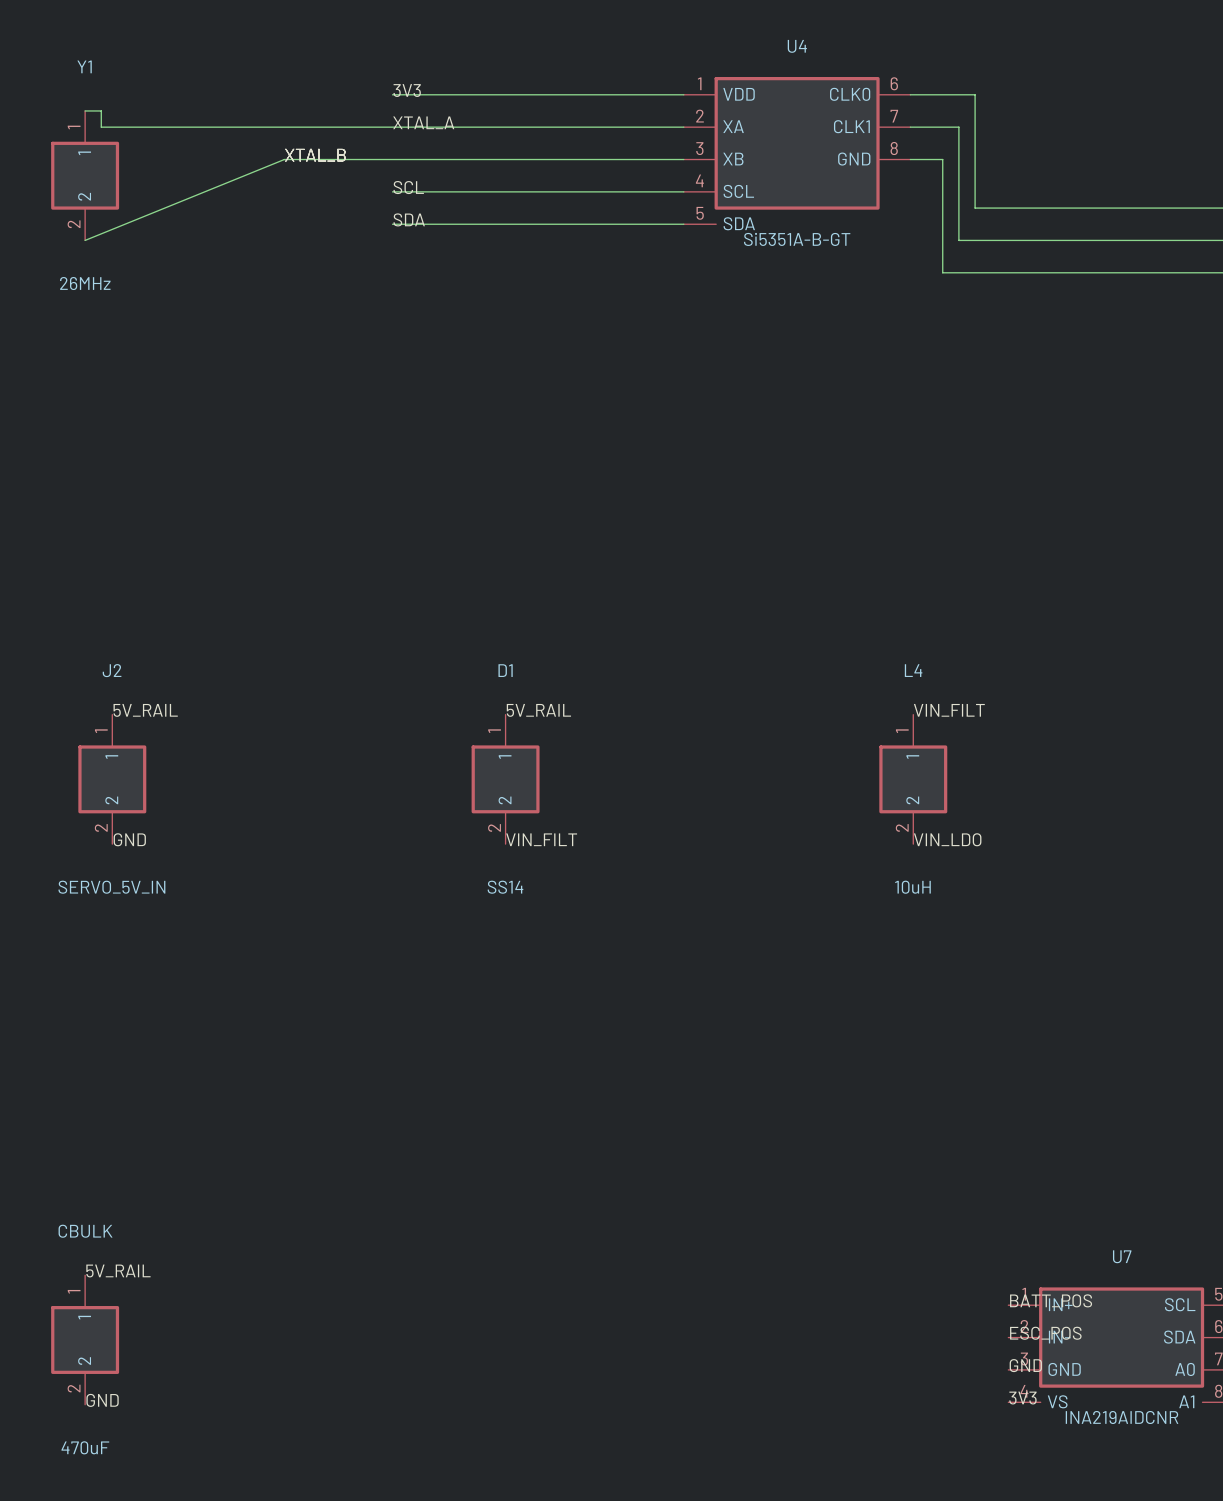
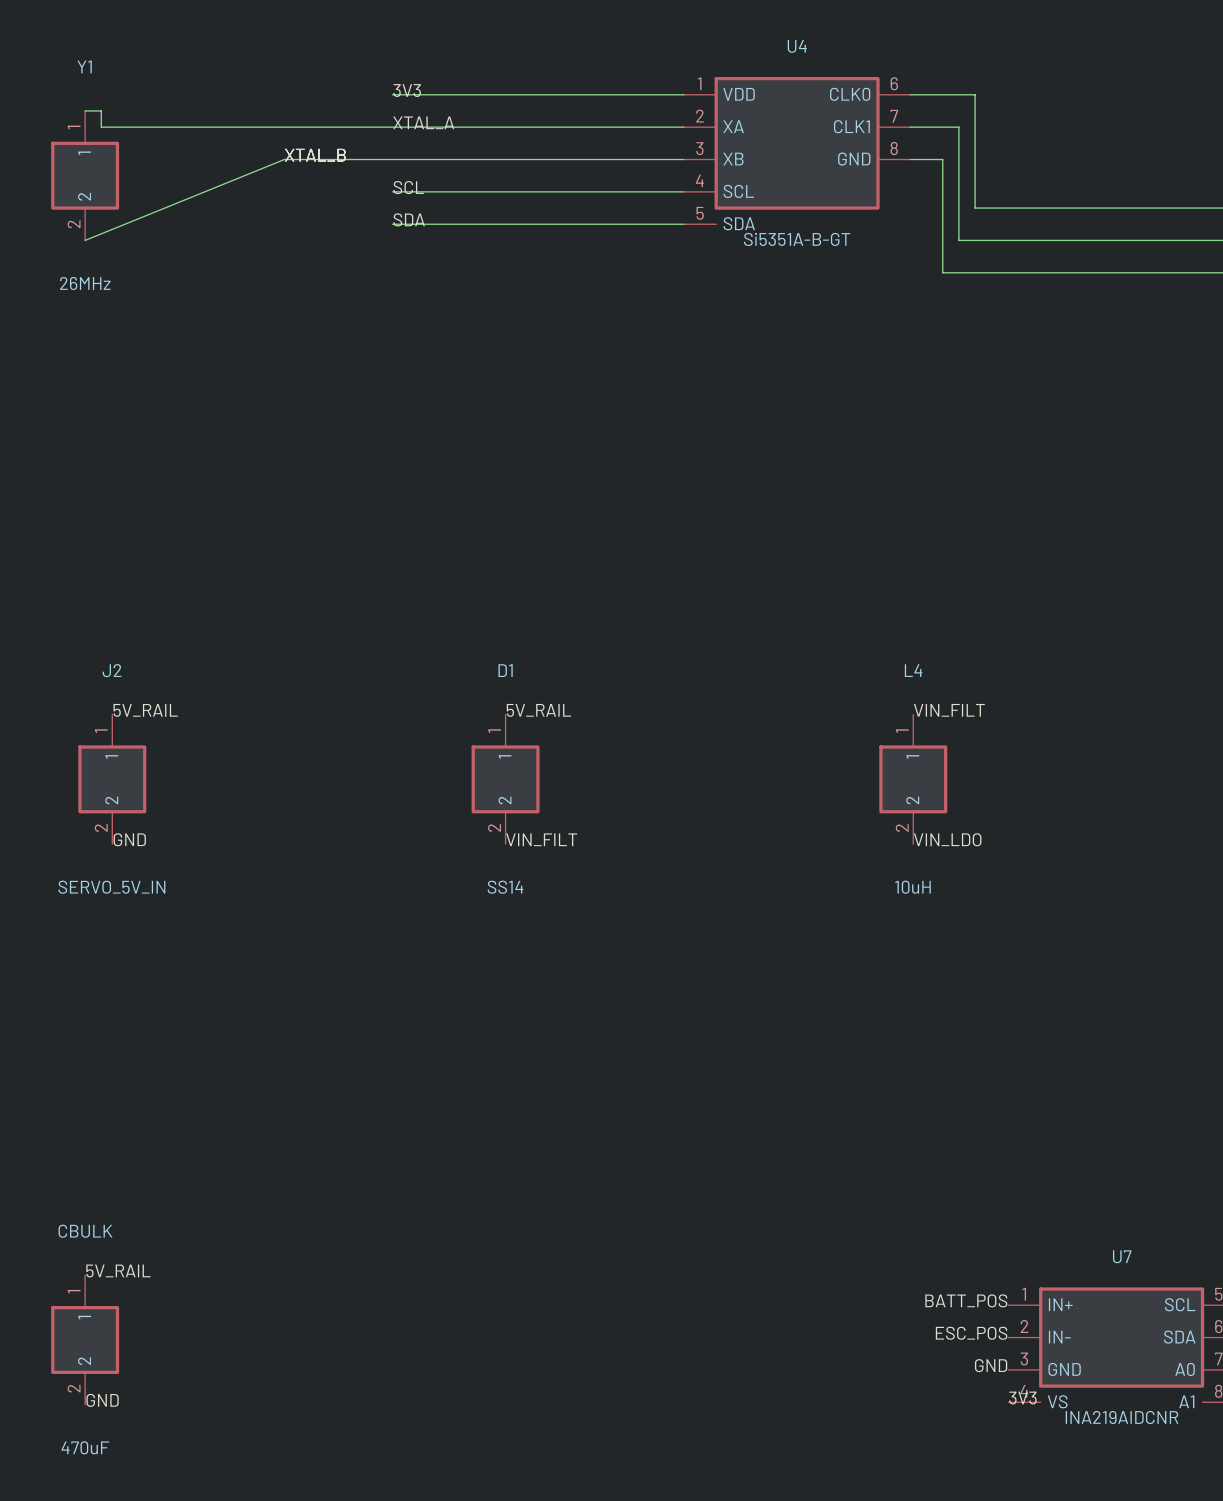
label position: BATT_POS (1051, 1300) -> BATT_POS (966, 1300)
label position: ESC_POS (1045, 1333) -> ESC_POS (971, 1333)
label position: GND (1025, 1365) -> GND (991, 1365)

